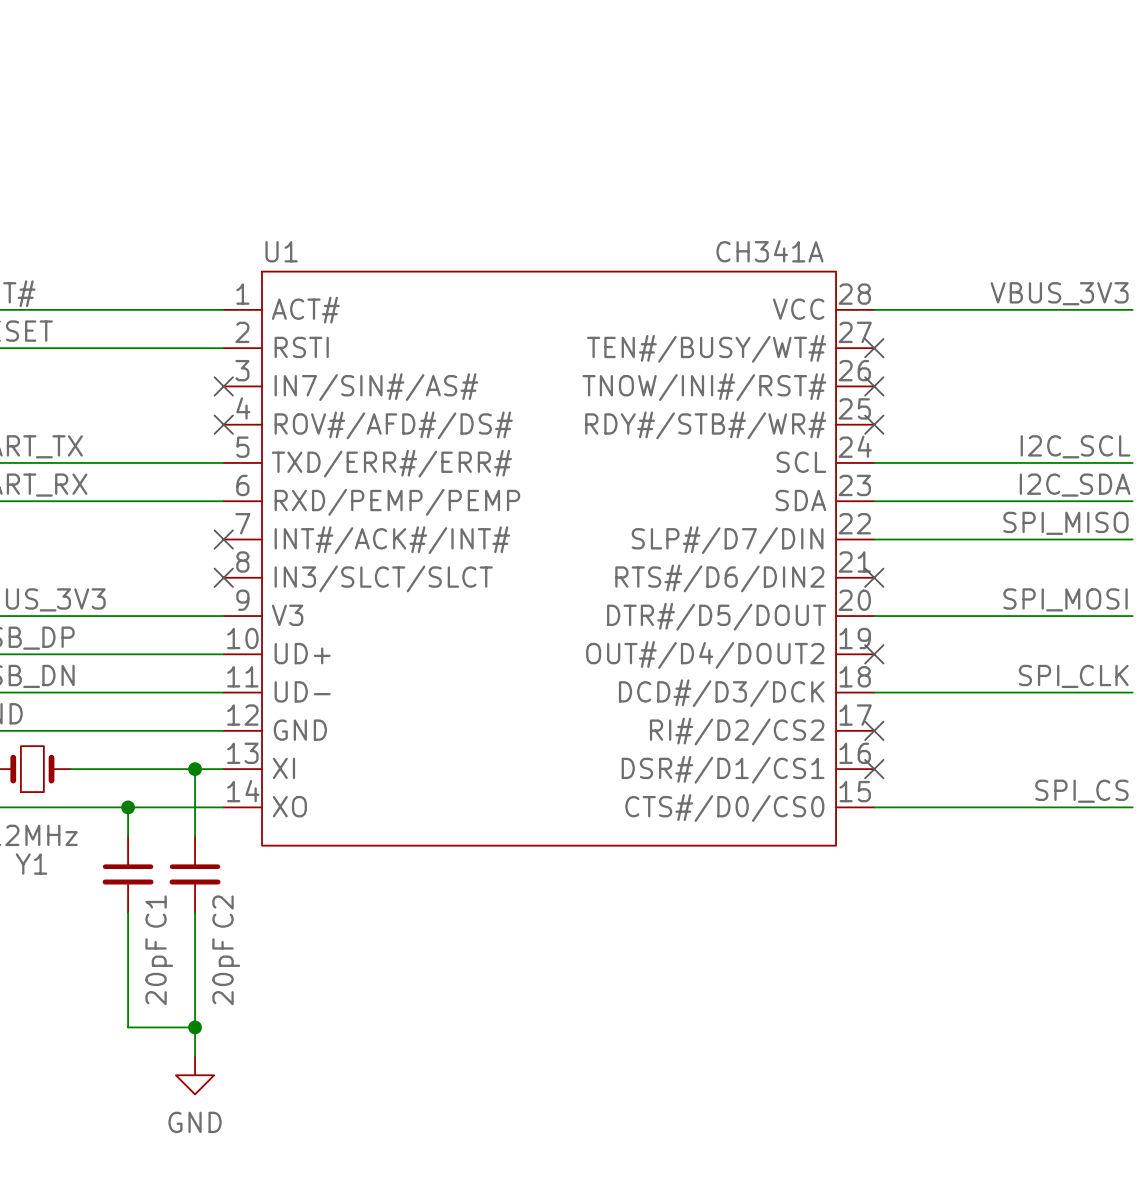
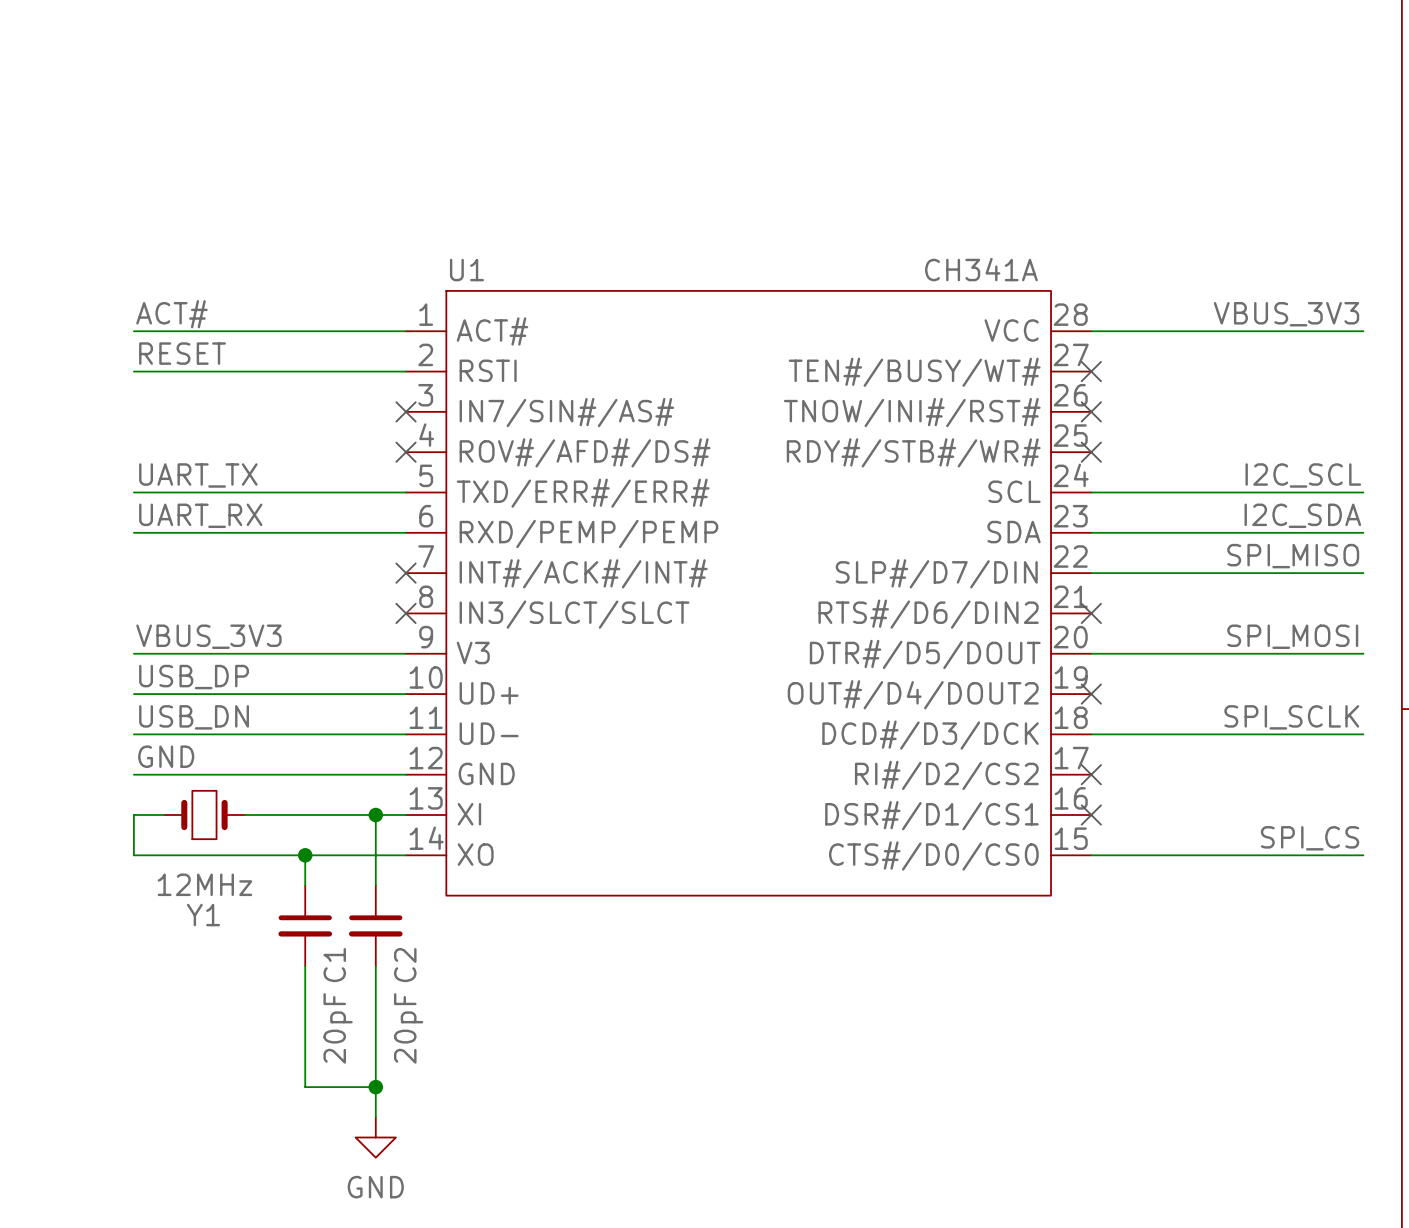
label: SPI_CLK (1073, 676) -> SPI_SCLK (1291, 717)

